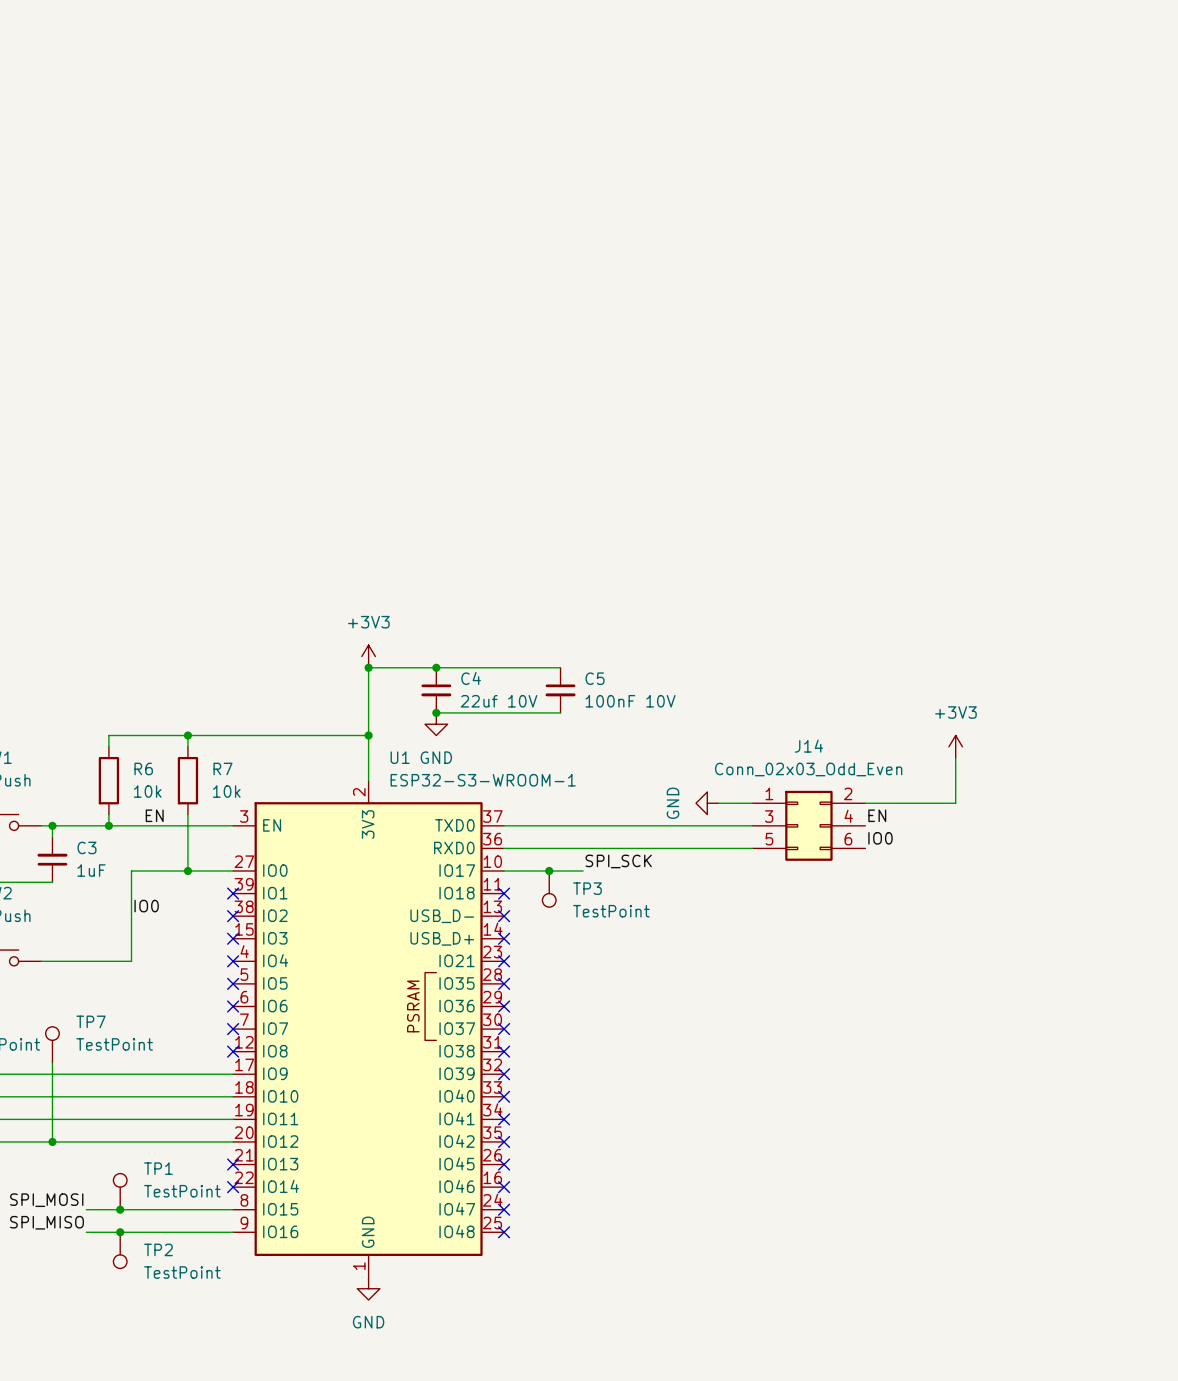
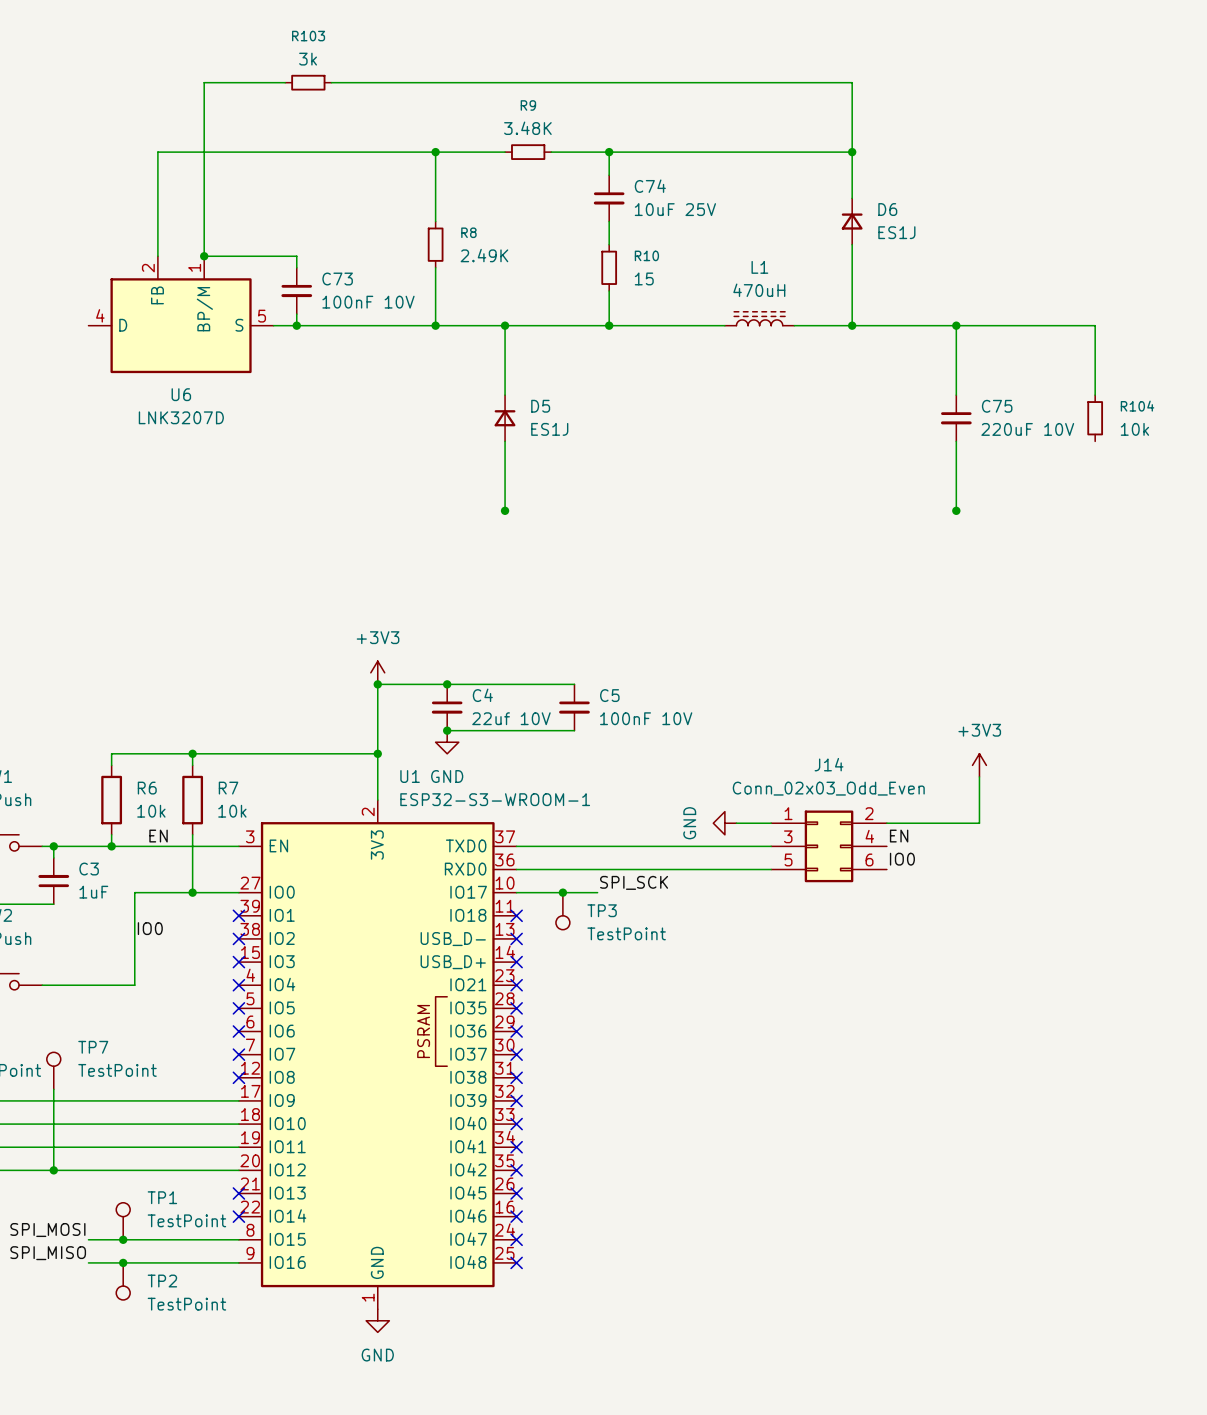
wire: none -> (285, 82) (204, 82) (204, 256) (296, 256) (296, 267)
R103: none -> 3k (308, 82)
wire: none -> (331, 82) (852, 82) (852, 198)
wire: none -> (435, 152) (435, 221)
junction: none -> (435, 152)
wire: none -> (505, 152) (157, 152) (157, 256)
R9: none -> 3.48K (528, 152)
wire: none -> (551, 152) (852, 152)
wire: none -> (609, 152) (609, 175)
junction: none -> (609, 152)
junction: none -> (852, 152)
C74: none -> 10uF 25V (609, 198)
wire: none -> (609, 221) (609, 244)
D6: none -> ES1J (852, 221)
R8: none -> 2.49K (435, 244)
wire: none -> (852, 244) (852, 325)
junction: none -> (204, 256)
wire: none -> (435, 267) (435, 325)
R10: none -> 15 (609, 267)
C73: none -> 100nF 10V (296, 290)
wire: none -> (609, 290) (609, 325)
wire: none -> (296, 314) (296, 325)
U6: none -> LNK3207D (181, 314)
L1: none -> 470uH (759, 318)
wire: none -> (273, 325) (724, 325)
junction: none -> (296, 325)
junction: none -> (435, 325)
wire: none -> (505, 325) (505, 395)
junction: none -> (505, 325)
junction: none -> (609, 325)
wire: none -> (794, 325) (1095, 325) (1095, 395)
junction: none -> (852, 325)
wire: none -> (956, 325) (956, 395)
junction: none -> (956, 325)
D5: none -> ES1J (505, 418)
C75: none -> 220uF 10V (956, 418)
R104: none -> 10k (1095, 418)
wire: none -> (505, 441) (505, 510)
wire: none -> (956, 441) (956, 510)
junction: none -> (505, 510)
junction: none -> (956, 510)

